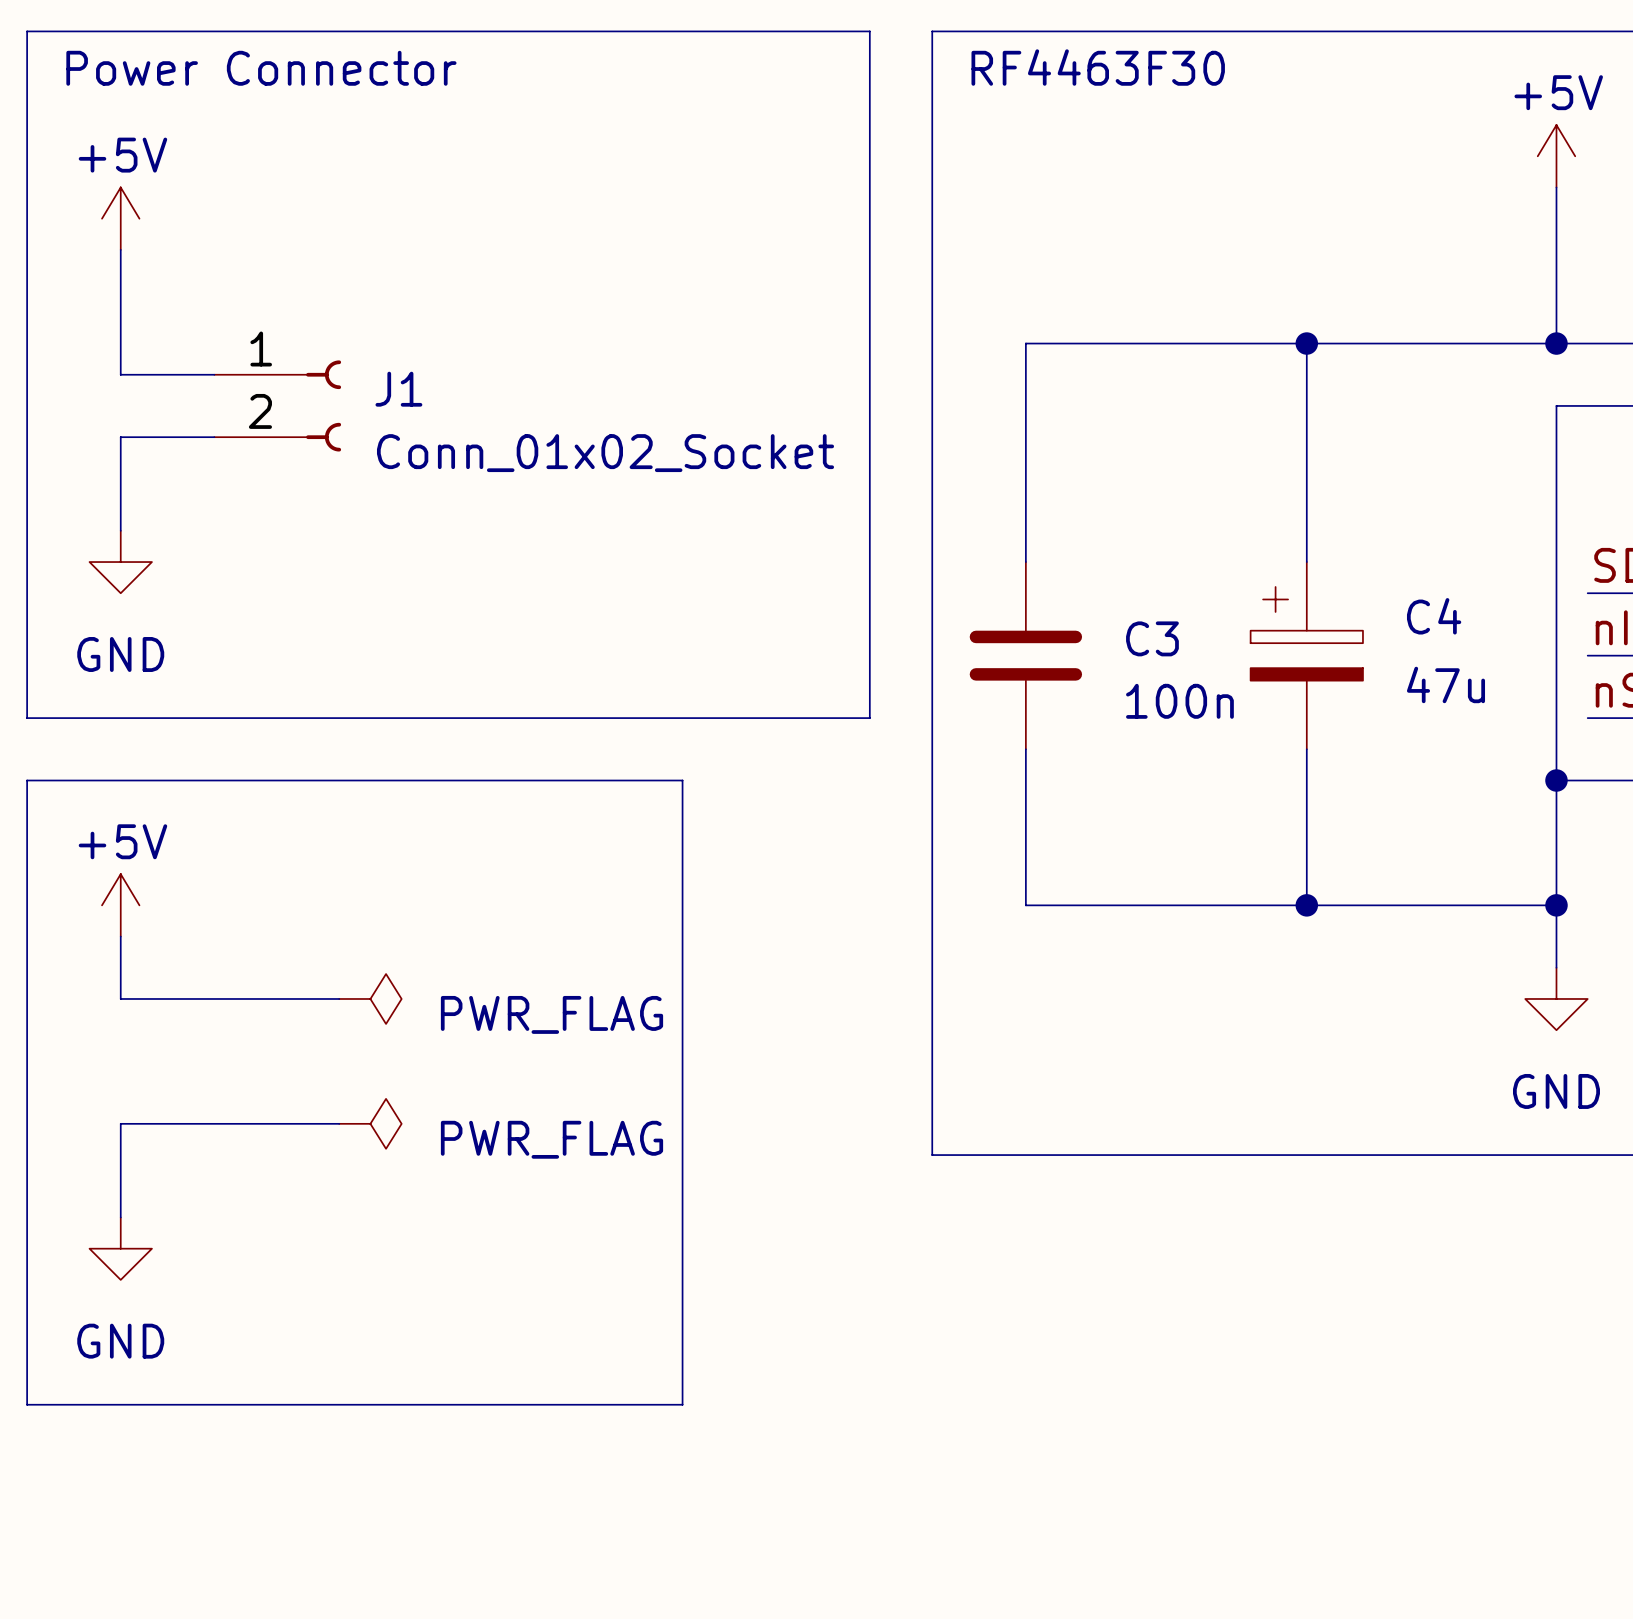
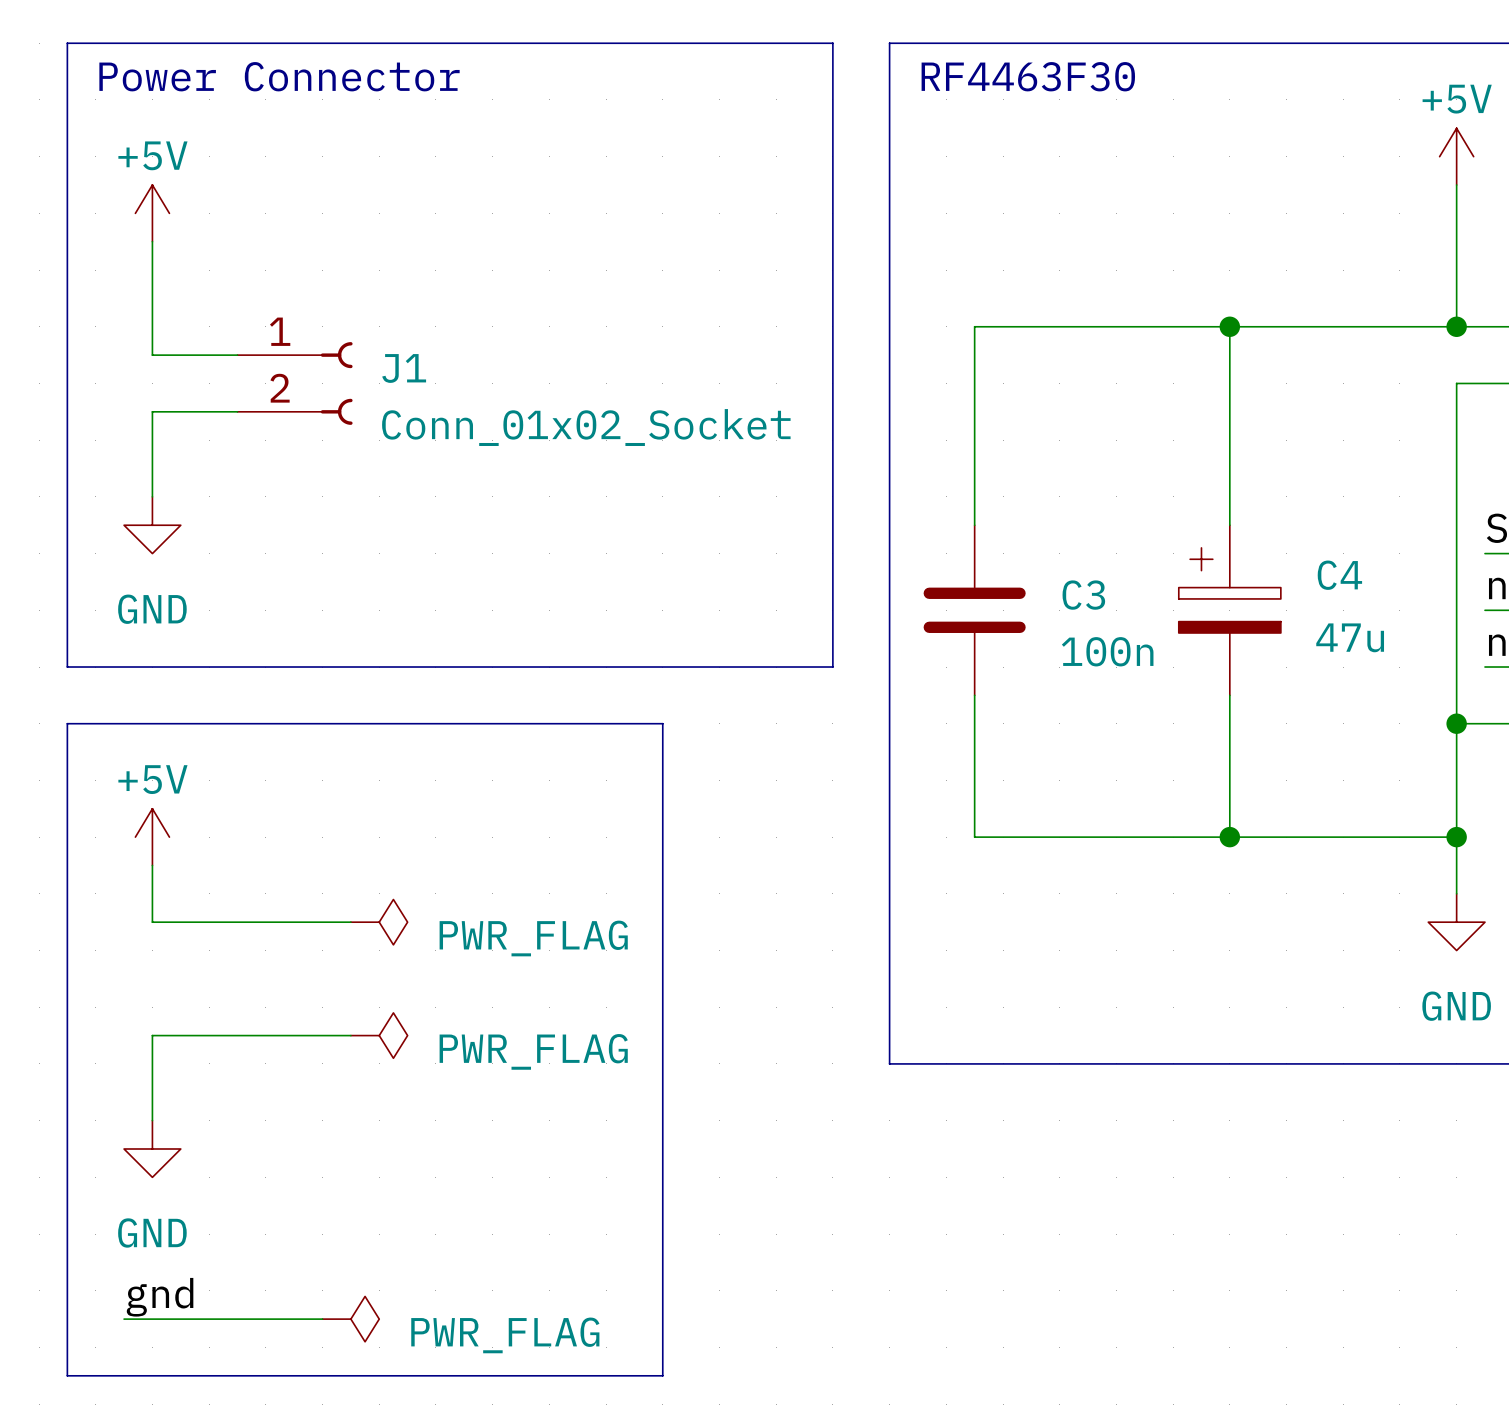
line: (27, 1404) (682, 1404) -> (67, 1290) (67, 1375) (662, 1375) (662, 1290)
label: none -> gnd (160, 1297)
wire: none -> (124, 1319) (322, 1319)
power symbol: none -> PWR_FLAG (350, 1319)

